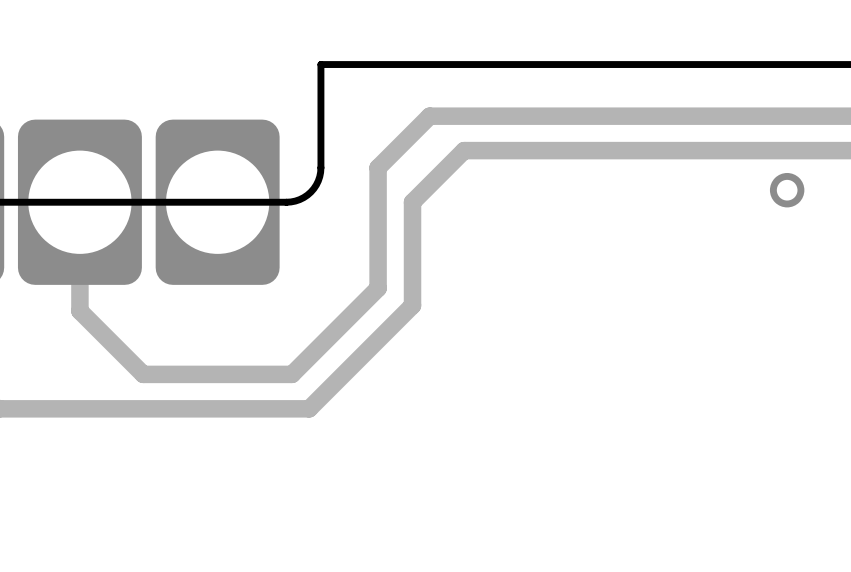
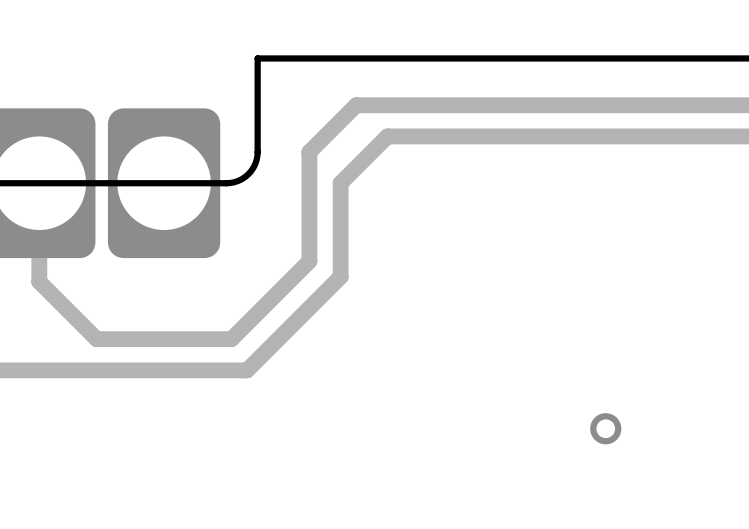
via position: (787, 190) -> (605, 428)

